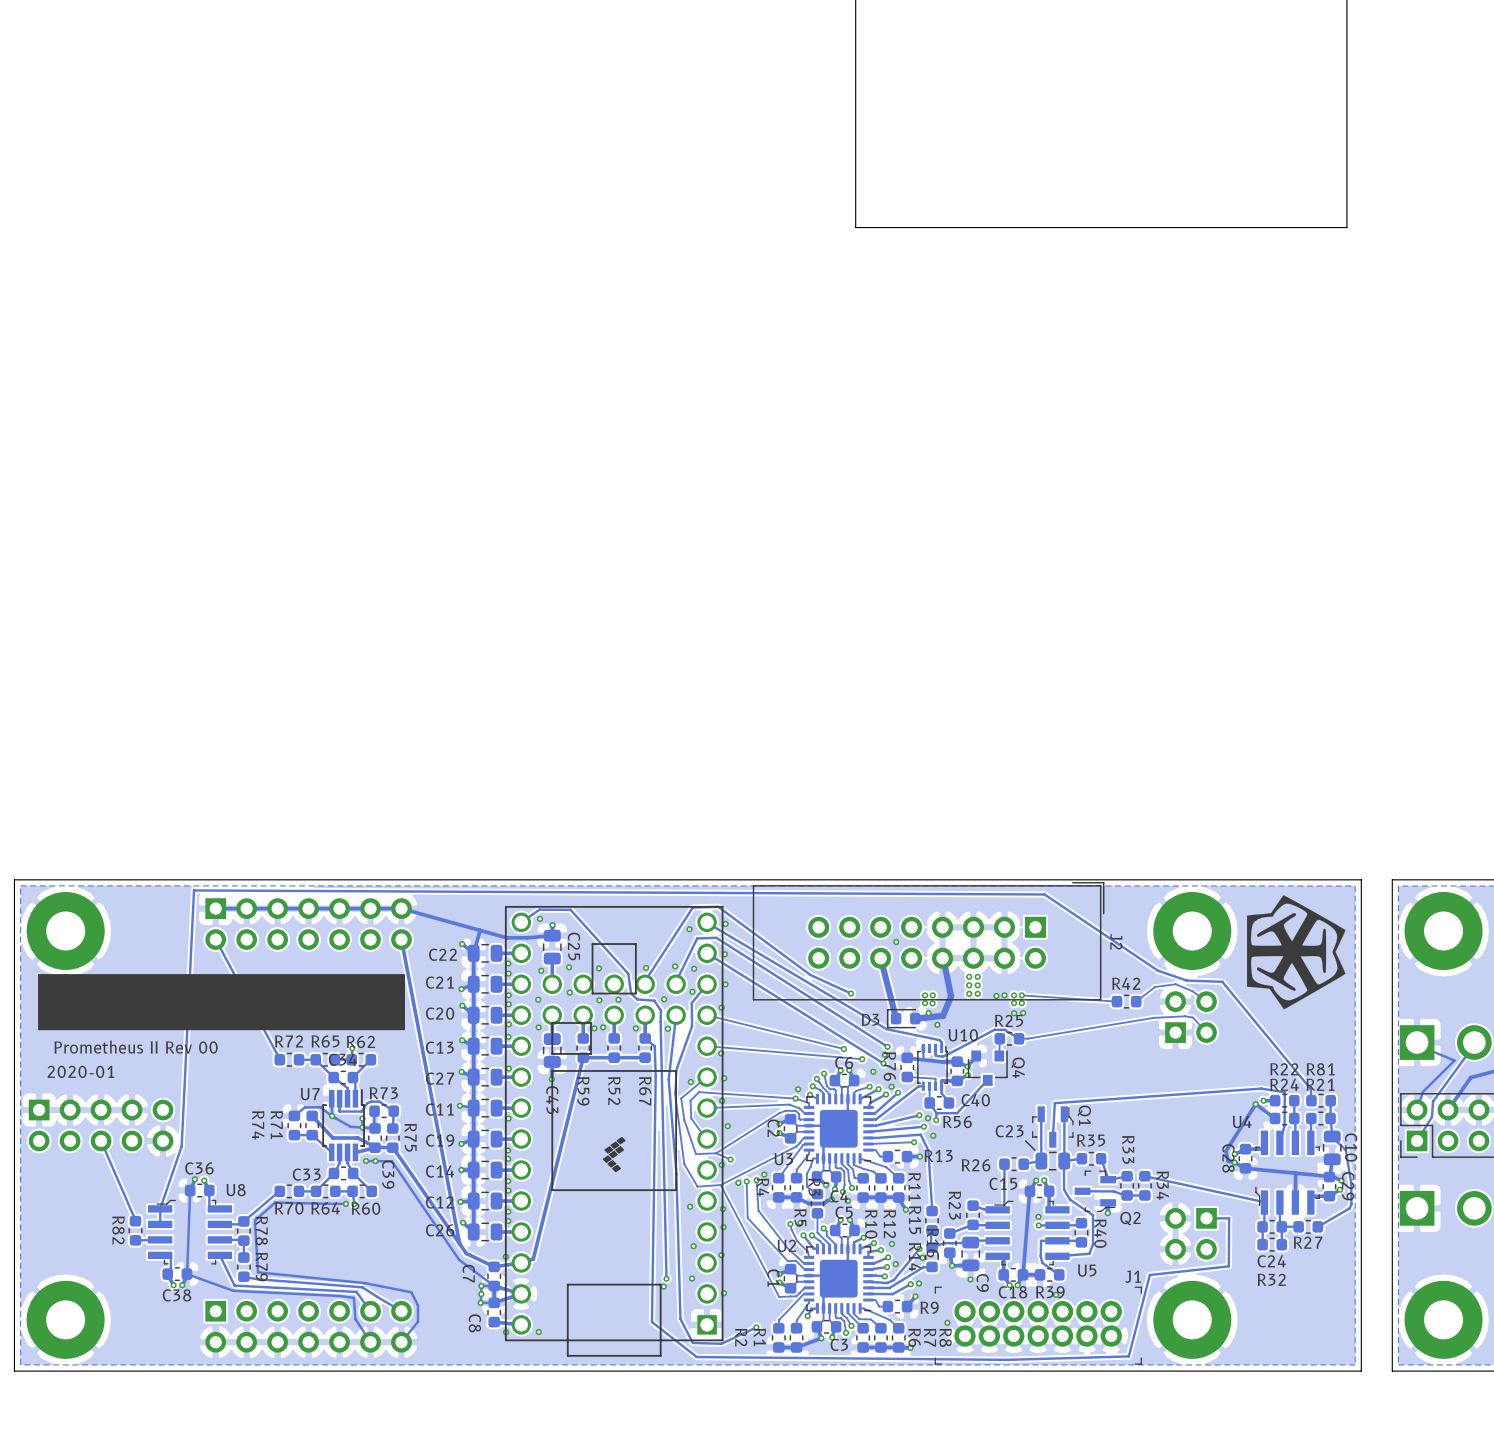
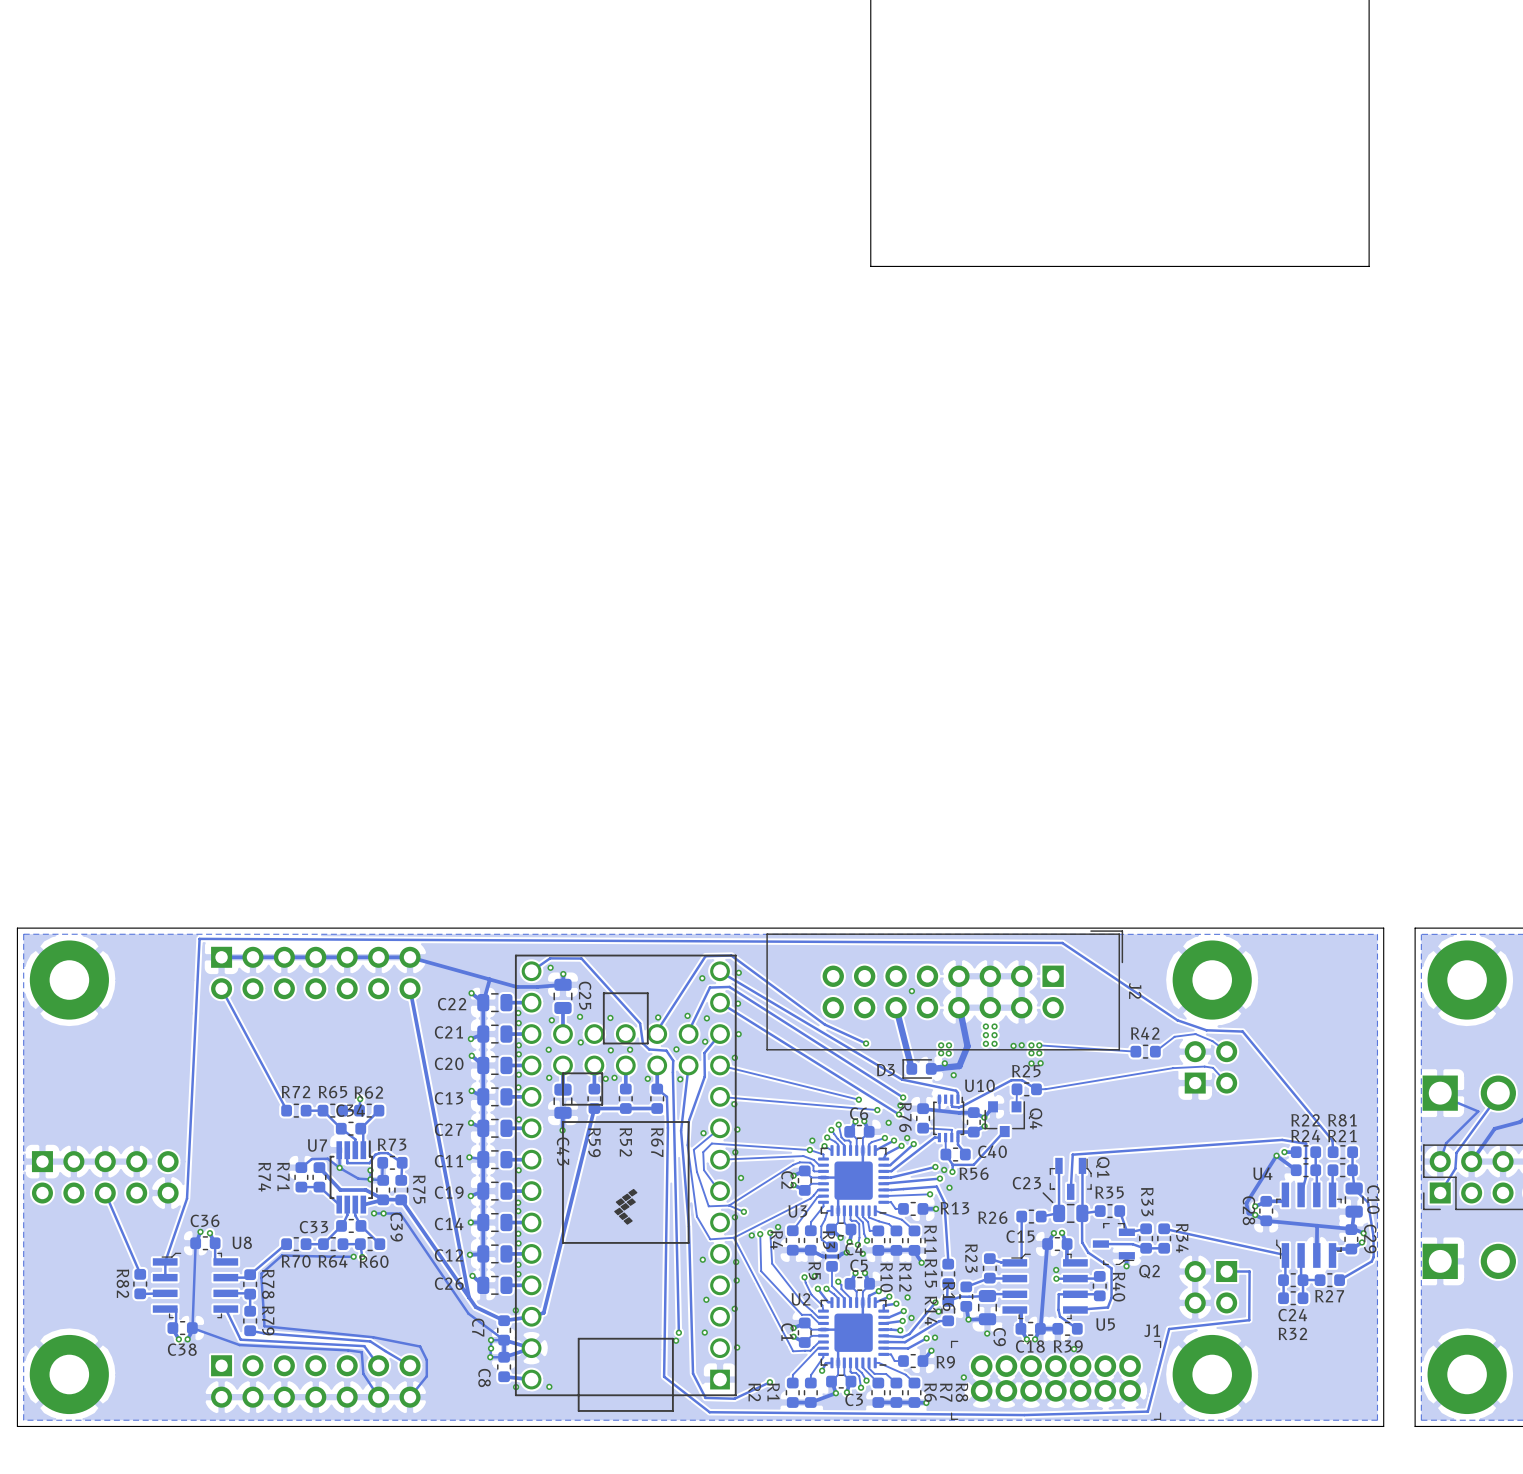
drawing: [1247, 895, 1346, 1010] -> none
drawing: [38, 974, 405, 1031] -> none
text: Prometheus II Rev 00 (136, 1047) -> none
text: 2020-01 (80, 1071) -> none

